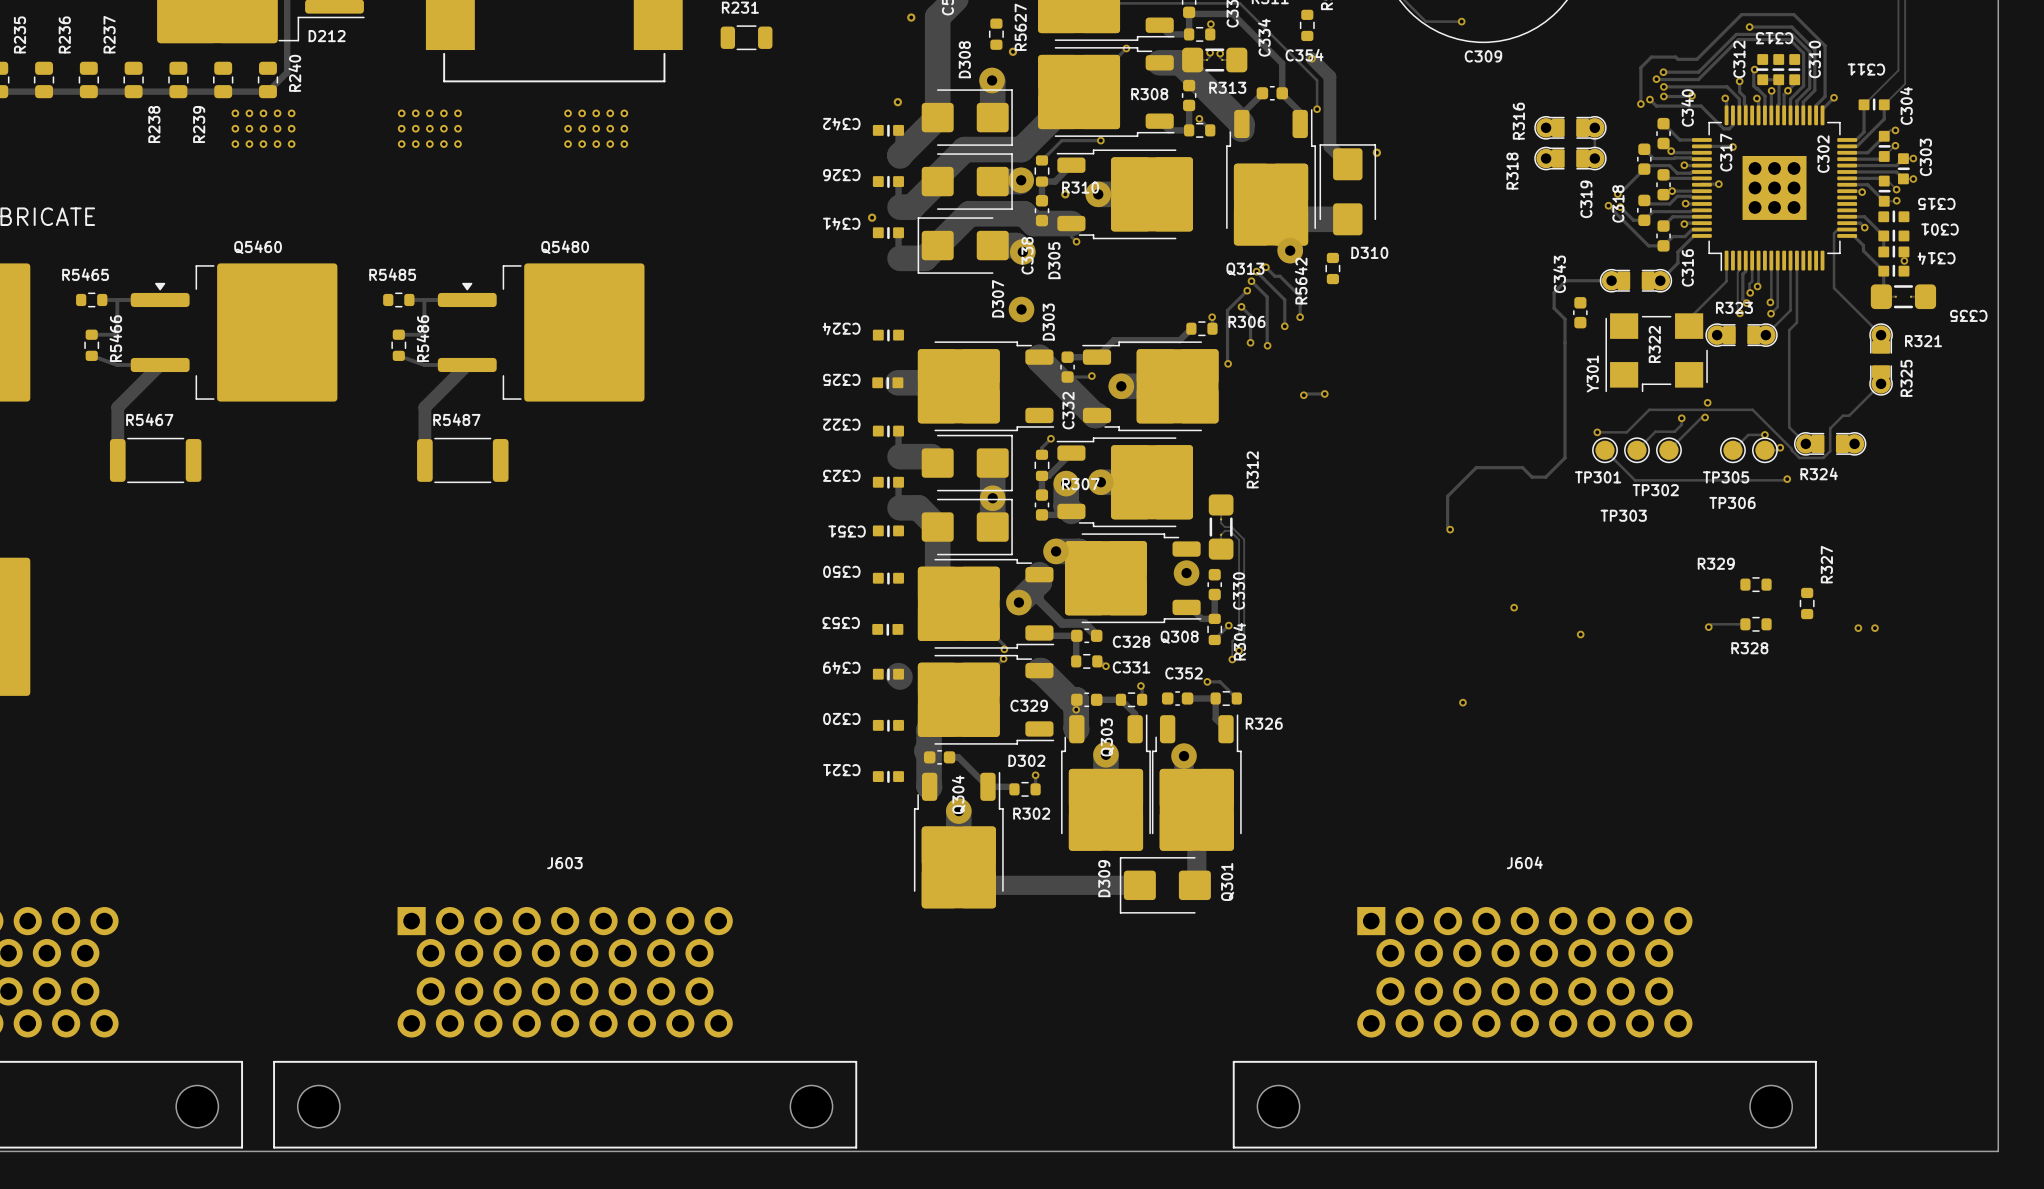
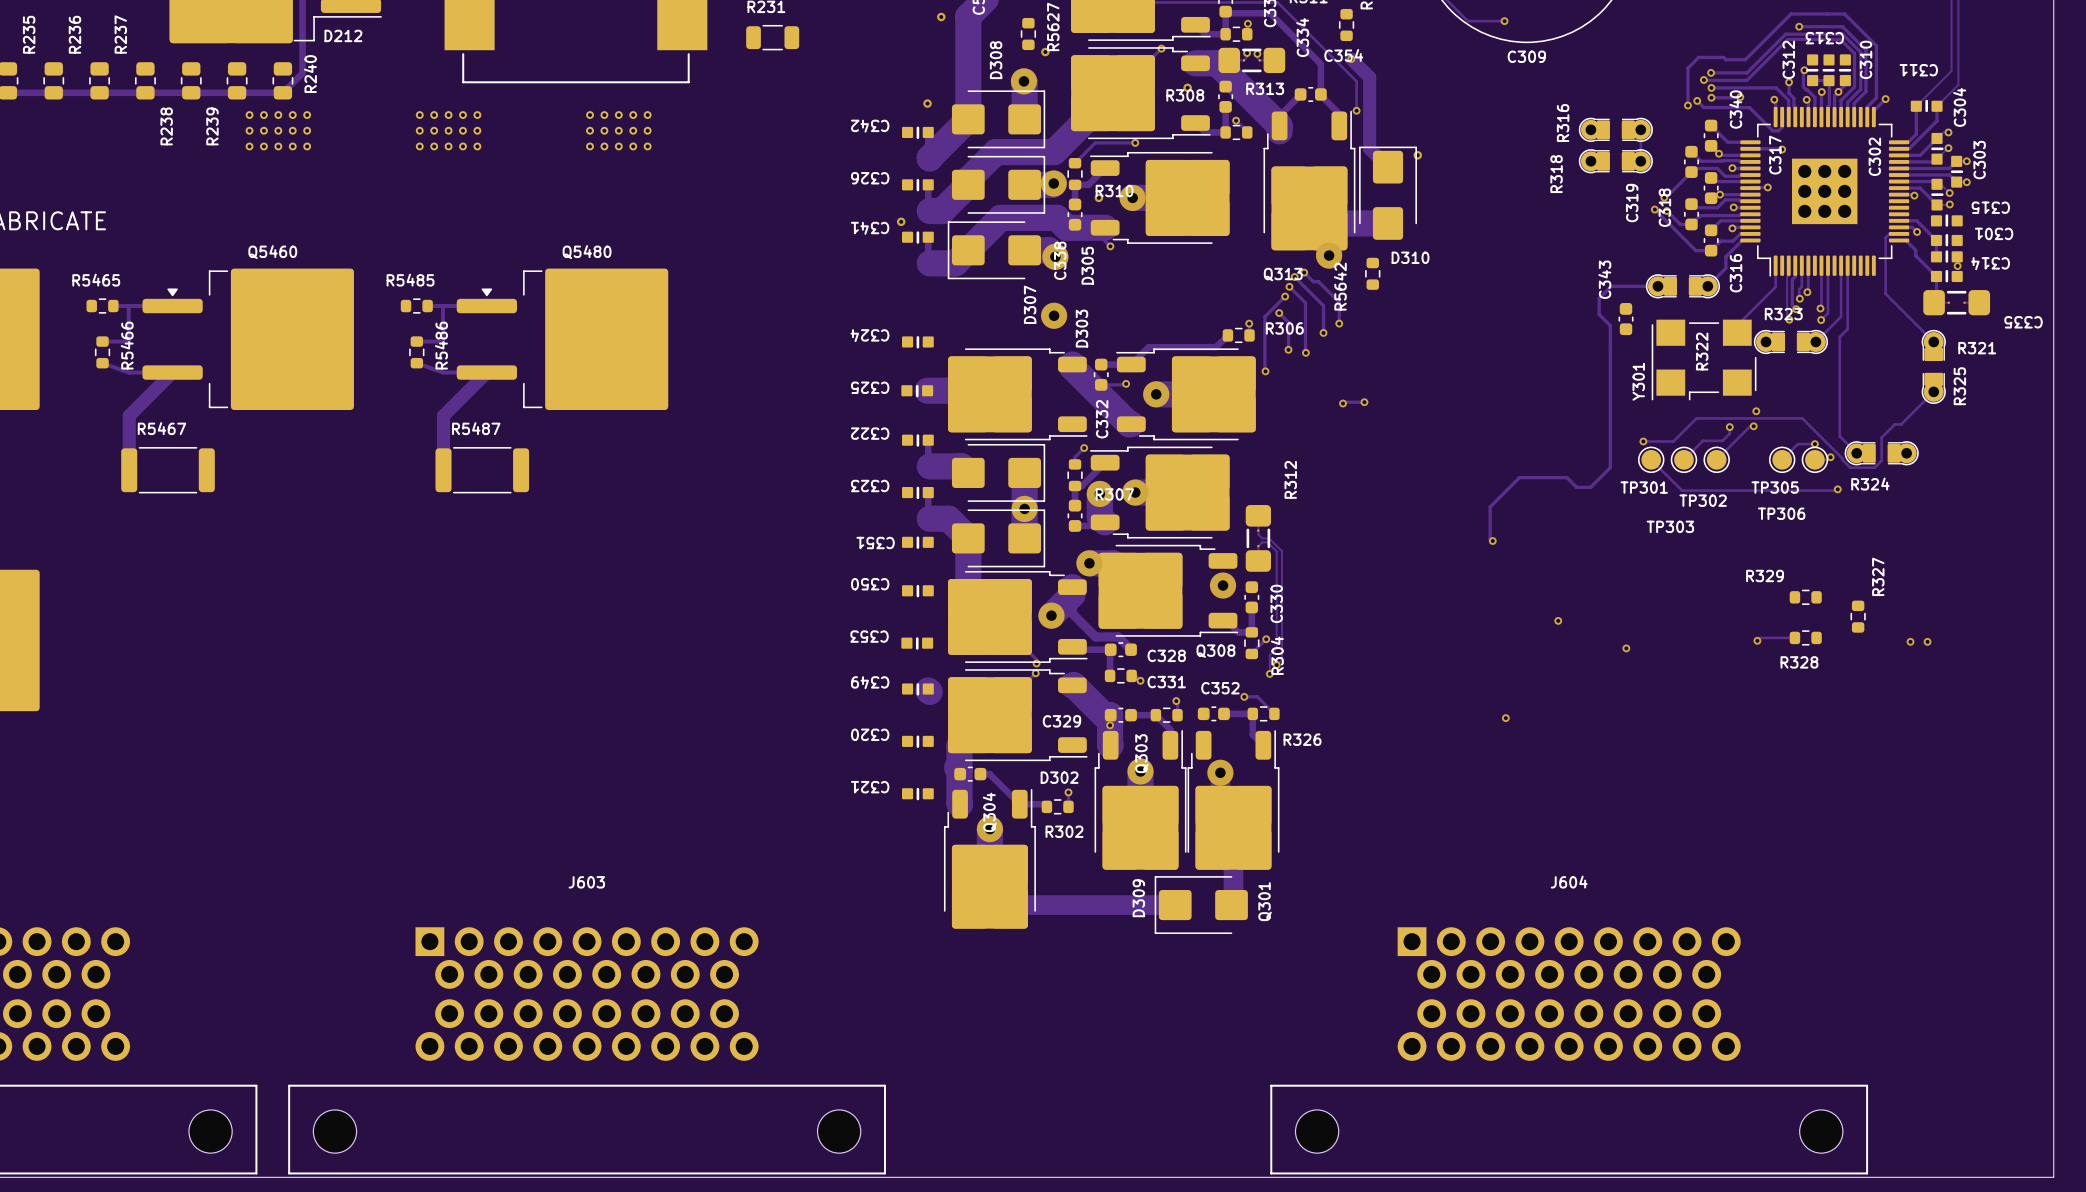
via: none -> (1187, 87)

